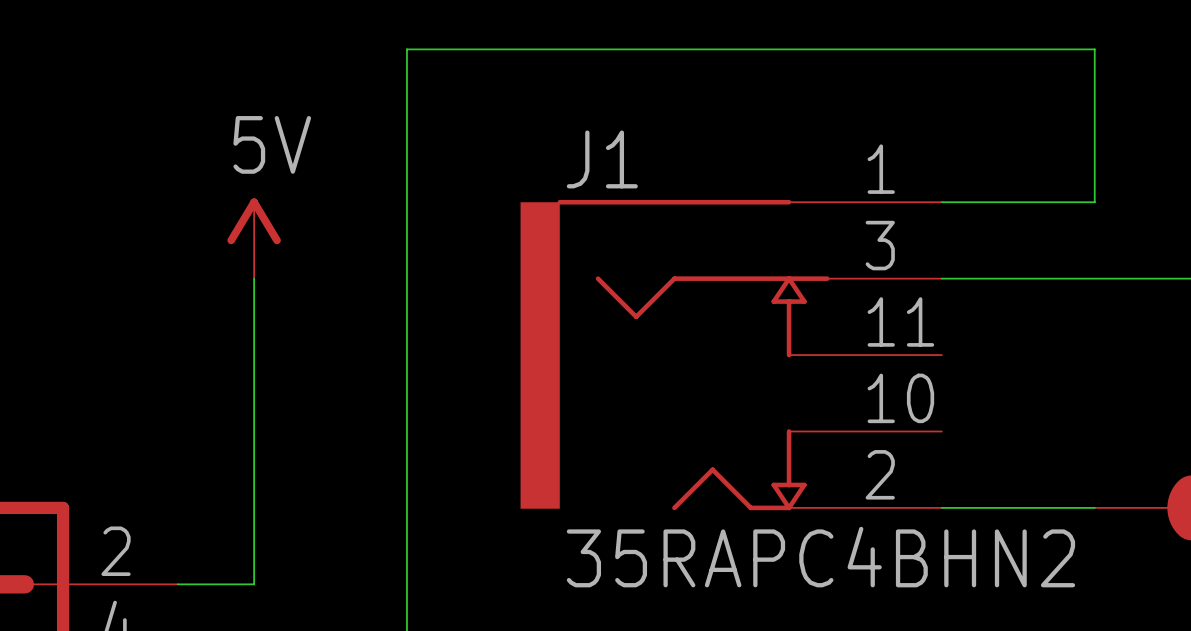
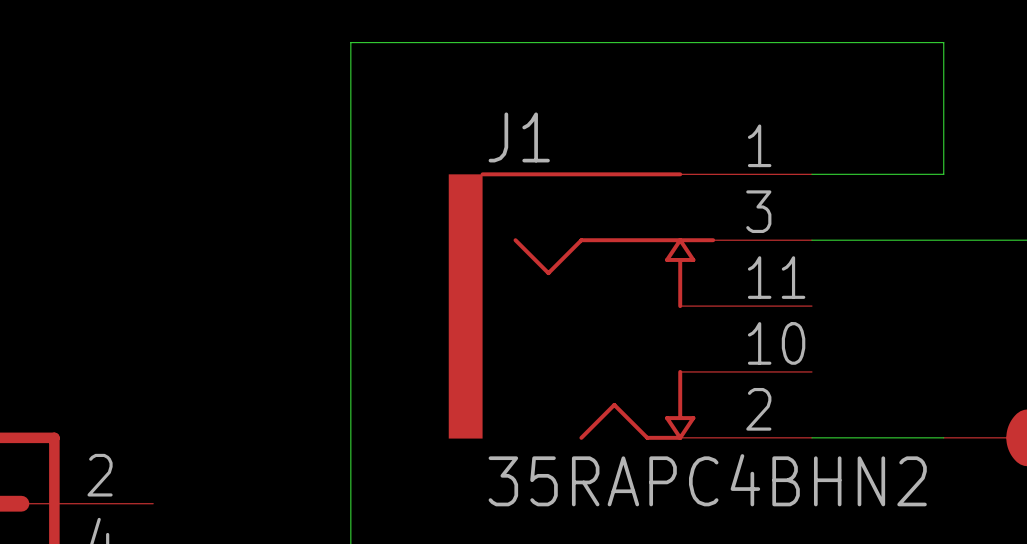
power symbol: 5V (254, 238) -> none
wire: (254, 278) (254, 584) (177, 584) -> none

